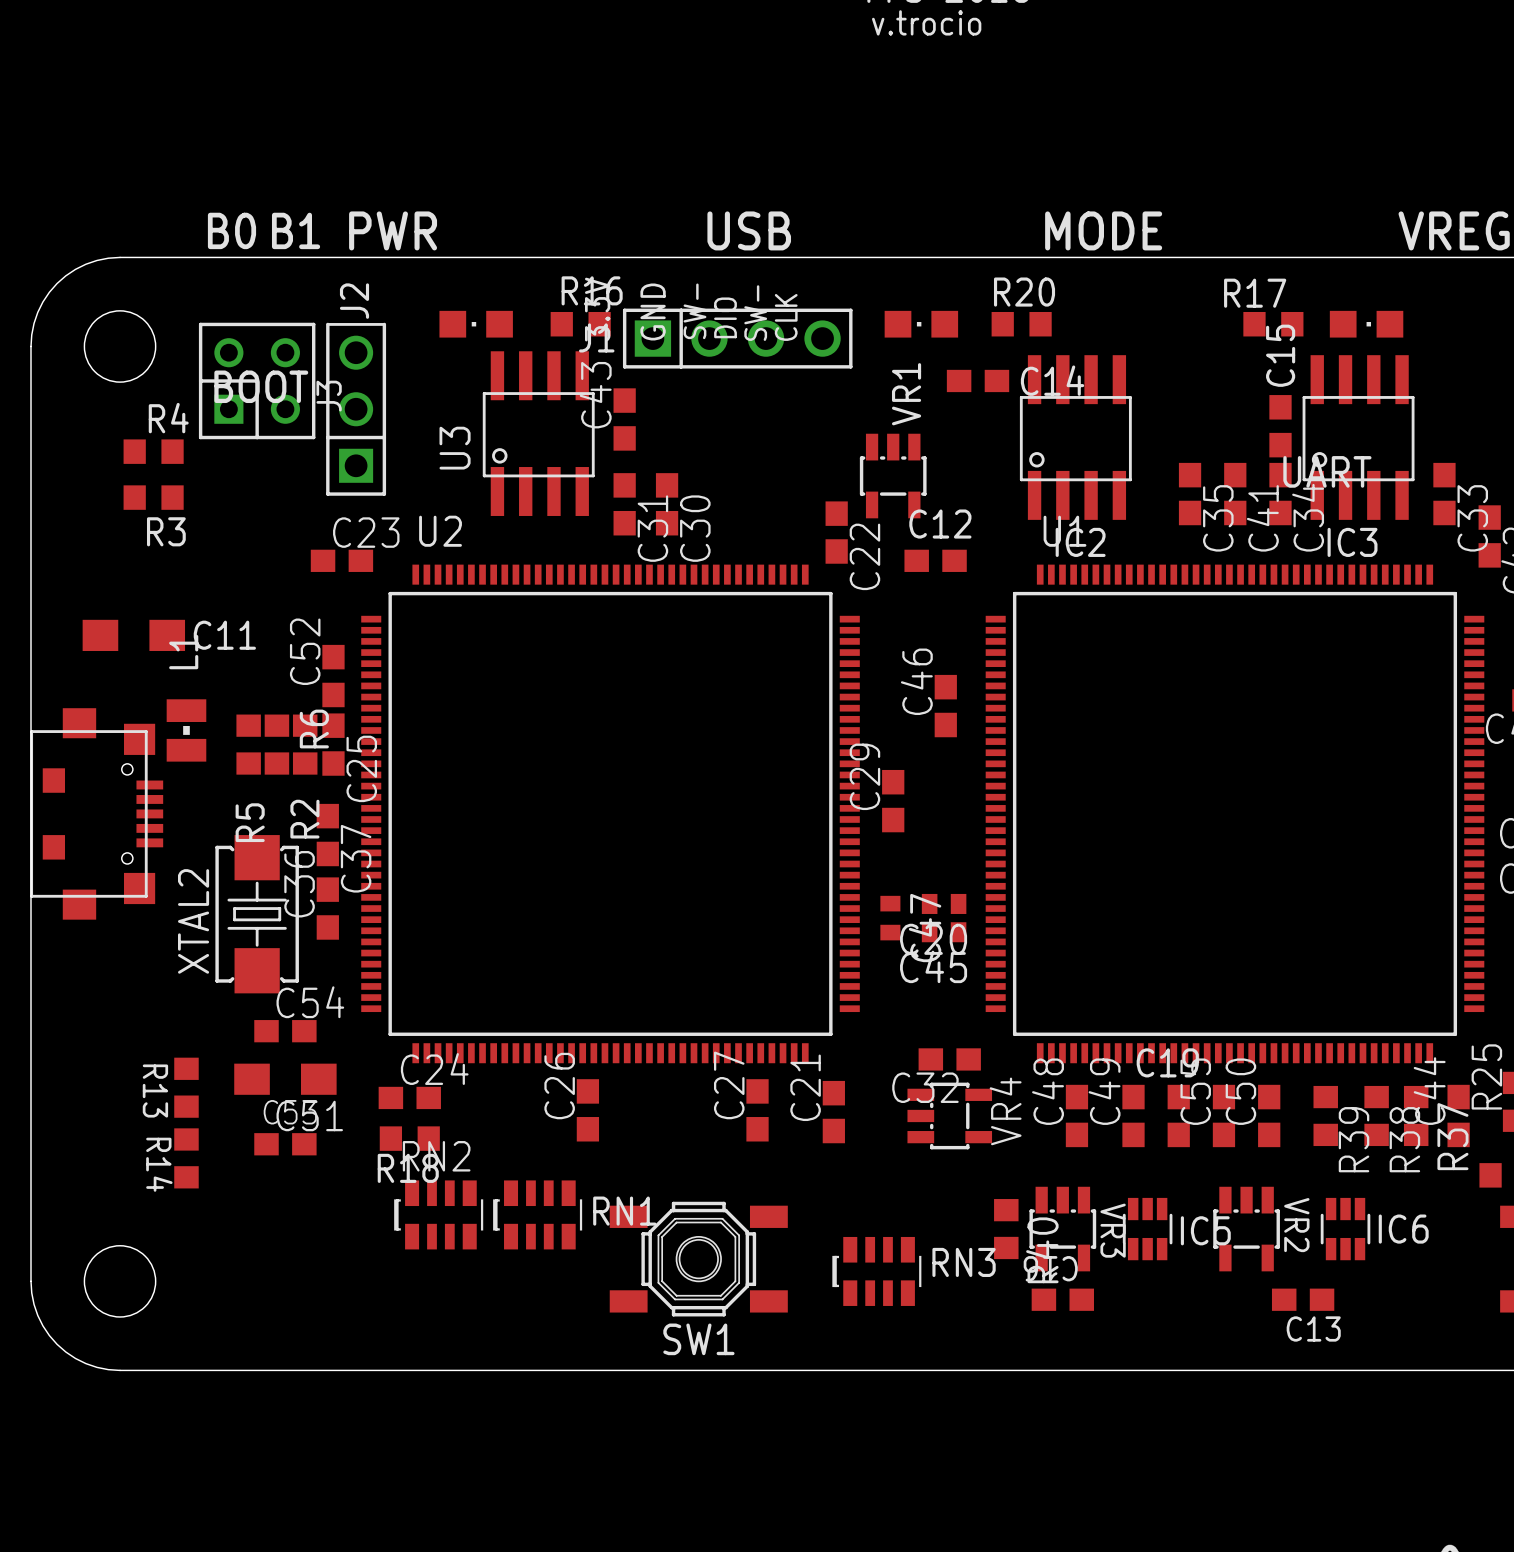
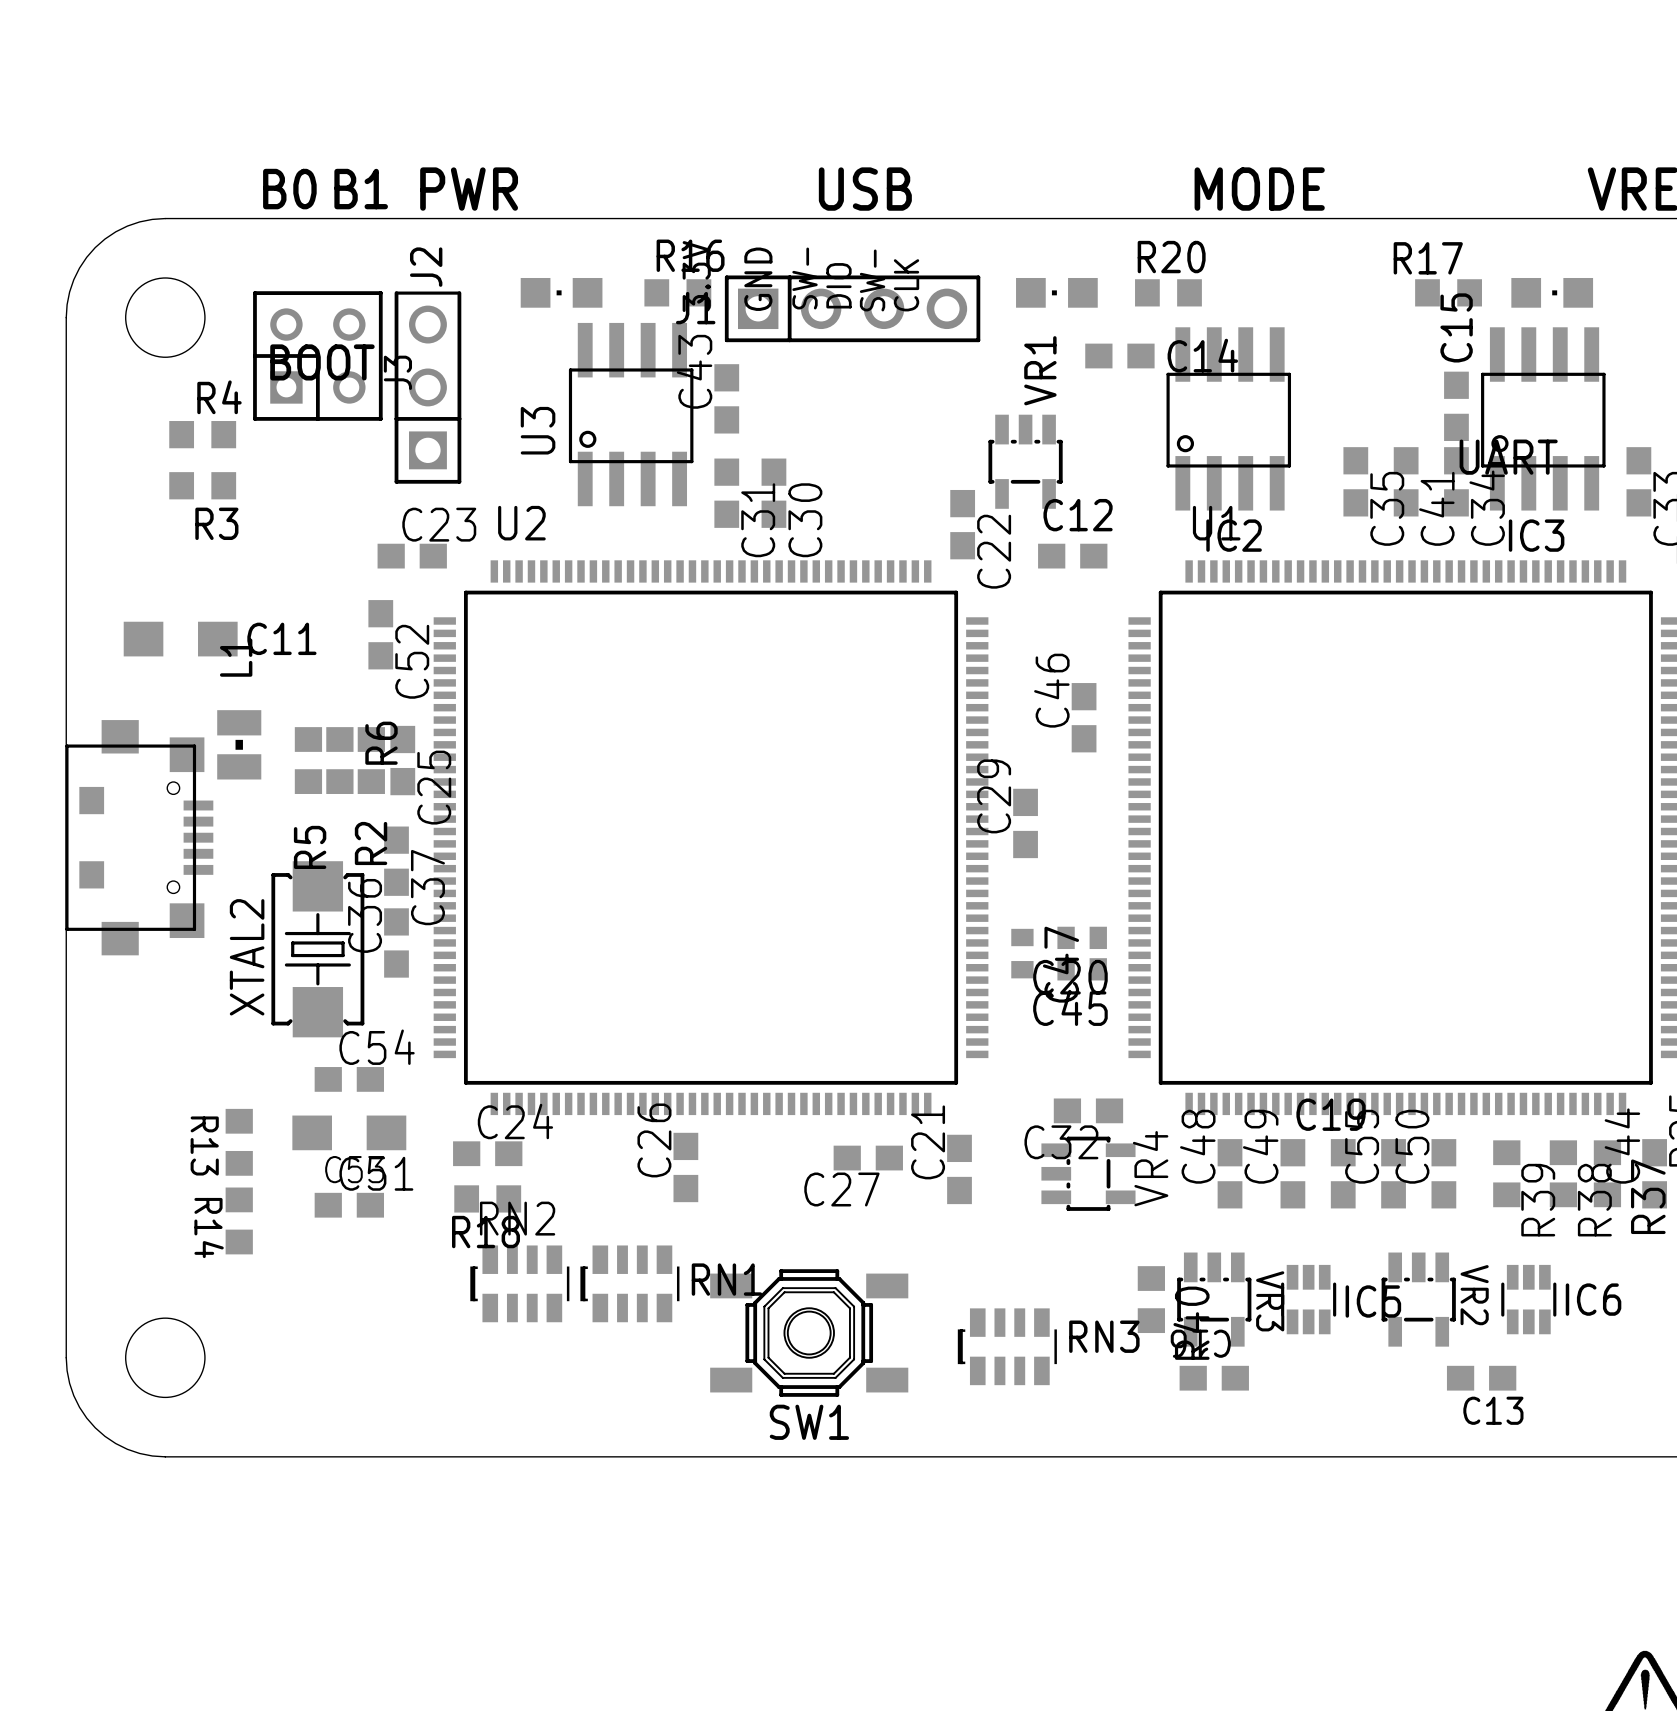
C52 name position: C52 (305, 651) -> C52 (412, 661)
C52 position: (333, 676) -> (380, 634)
C27 name position: C27 (729, 1085) -> C27 (841, 1189)
C27 rotation: 0° (757, 1110) -> 90° clockwise (868, 1158)

